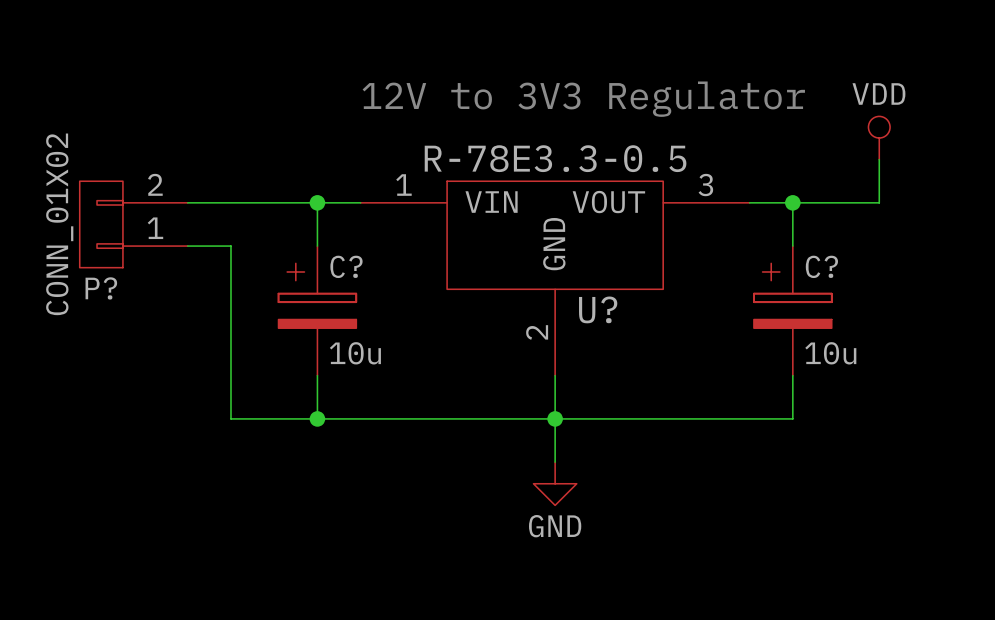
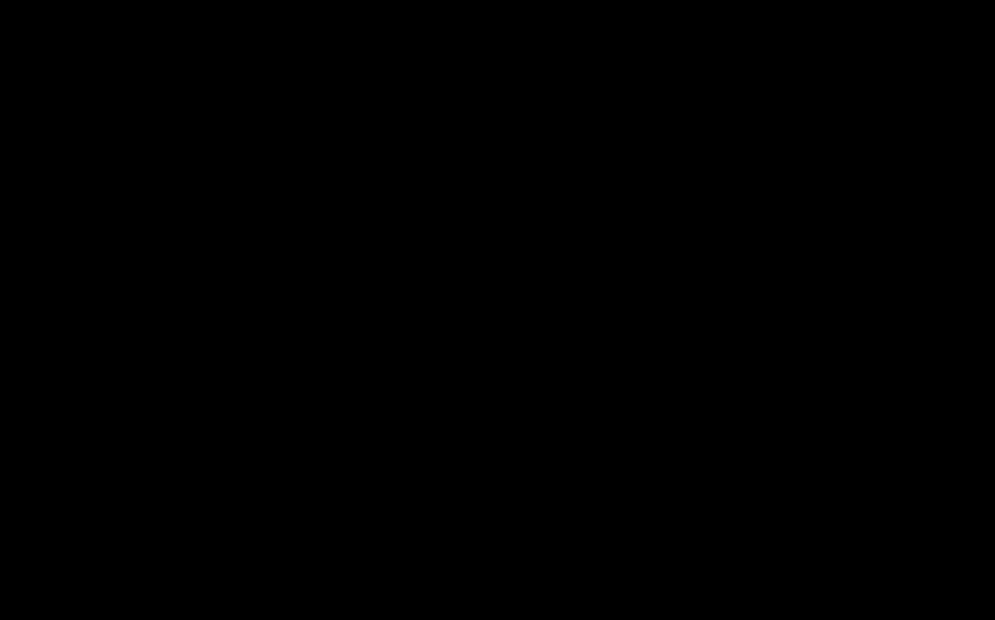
text: 12V to 3V3 Regulator (583, 99) -> none
power symbol: VDD (879, 138) -> none
wire: (879, 159) (879, 202) (749, 202) -> none
wire: (187, 202) (360, 202) -> none
wire: (317, 202) (317, 246) -> none
junction: (317, 202) -> none
wire: (792, 202) (792, 246) -> none
junction: (792, 202) -> none
P?: CONN_01X02 (133, 224) -> none
wire: (187, 246) (230, 246) (230, 418) (792, 418) (792, 375) -> none
U?: R-78E3.3-0.5 (555, 278) -> none
C?: 10u (317, 310) -> none
C?: 10u (792, 310) -> none
wire: (317, 375) (317, 418) -> none
wire: (555, 375) (555, 462) -> none
junction: (317, 418) -> none
junction: (555, 418) -> none
power symbol: GND (555, 483) -> none

